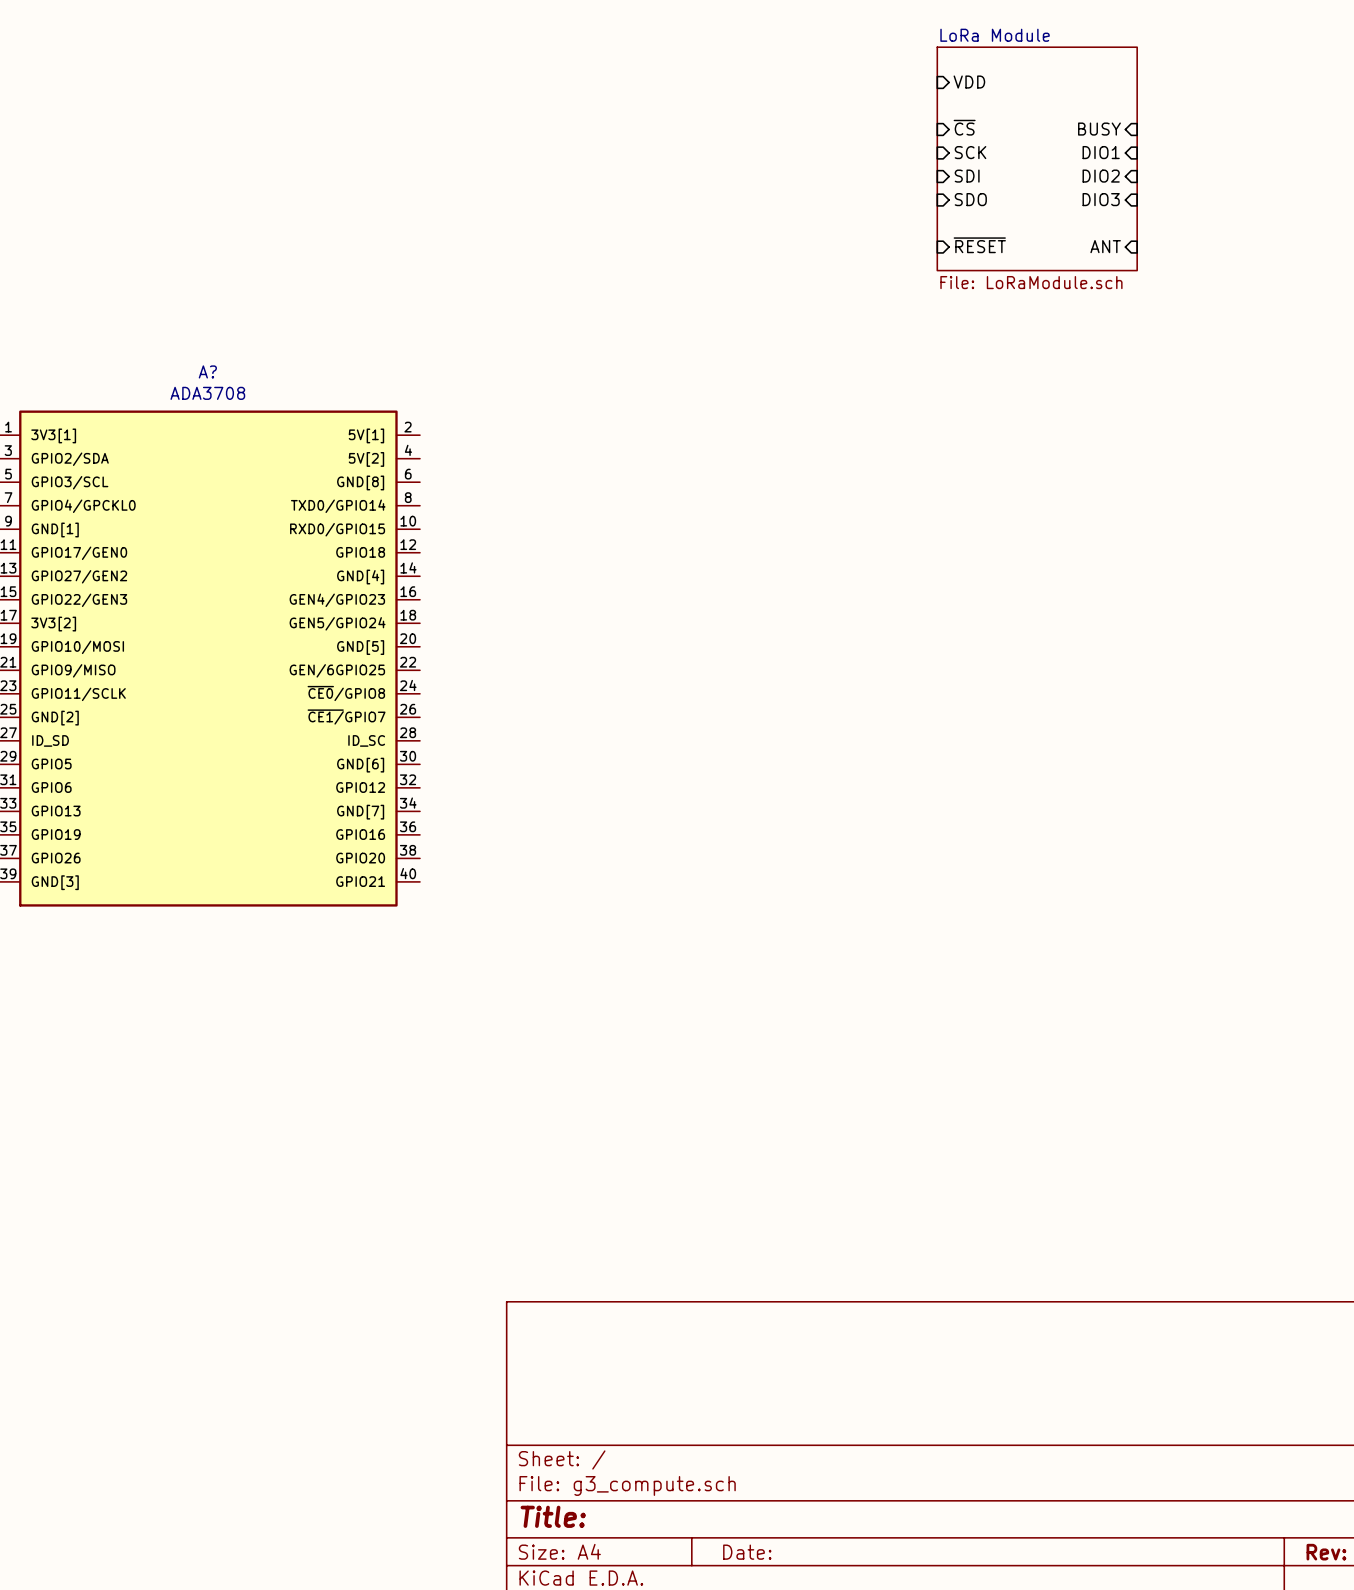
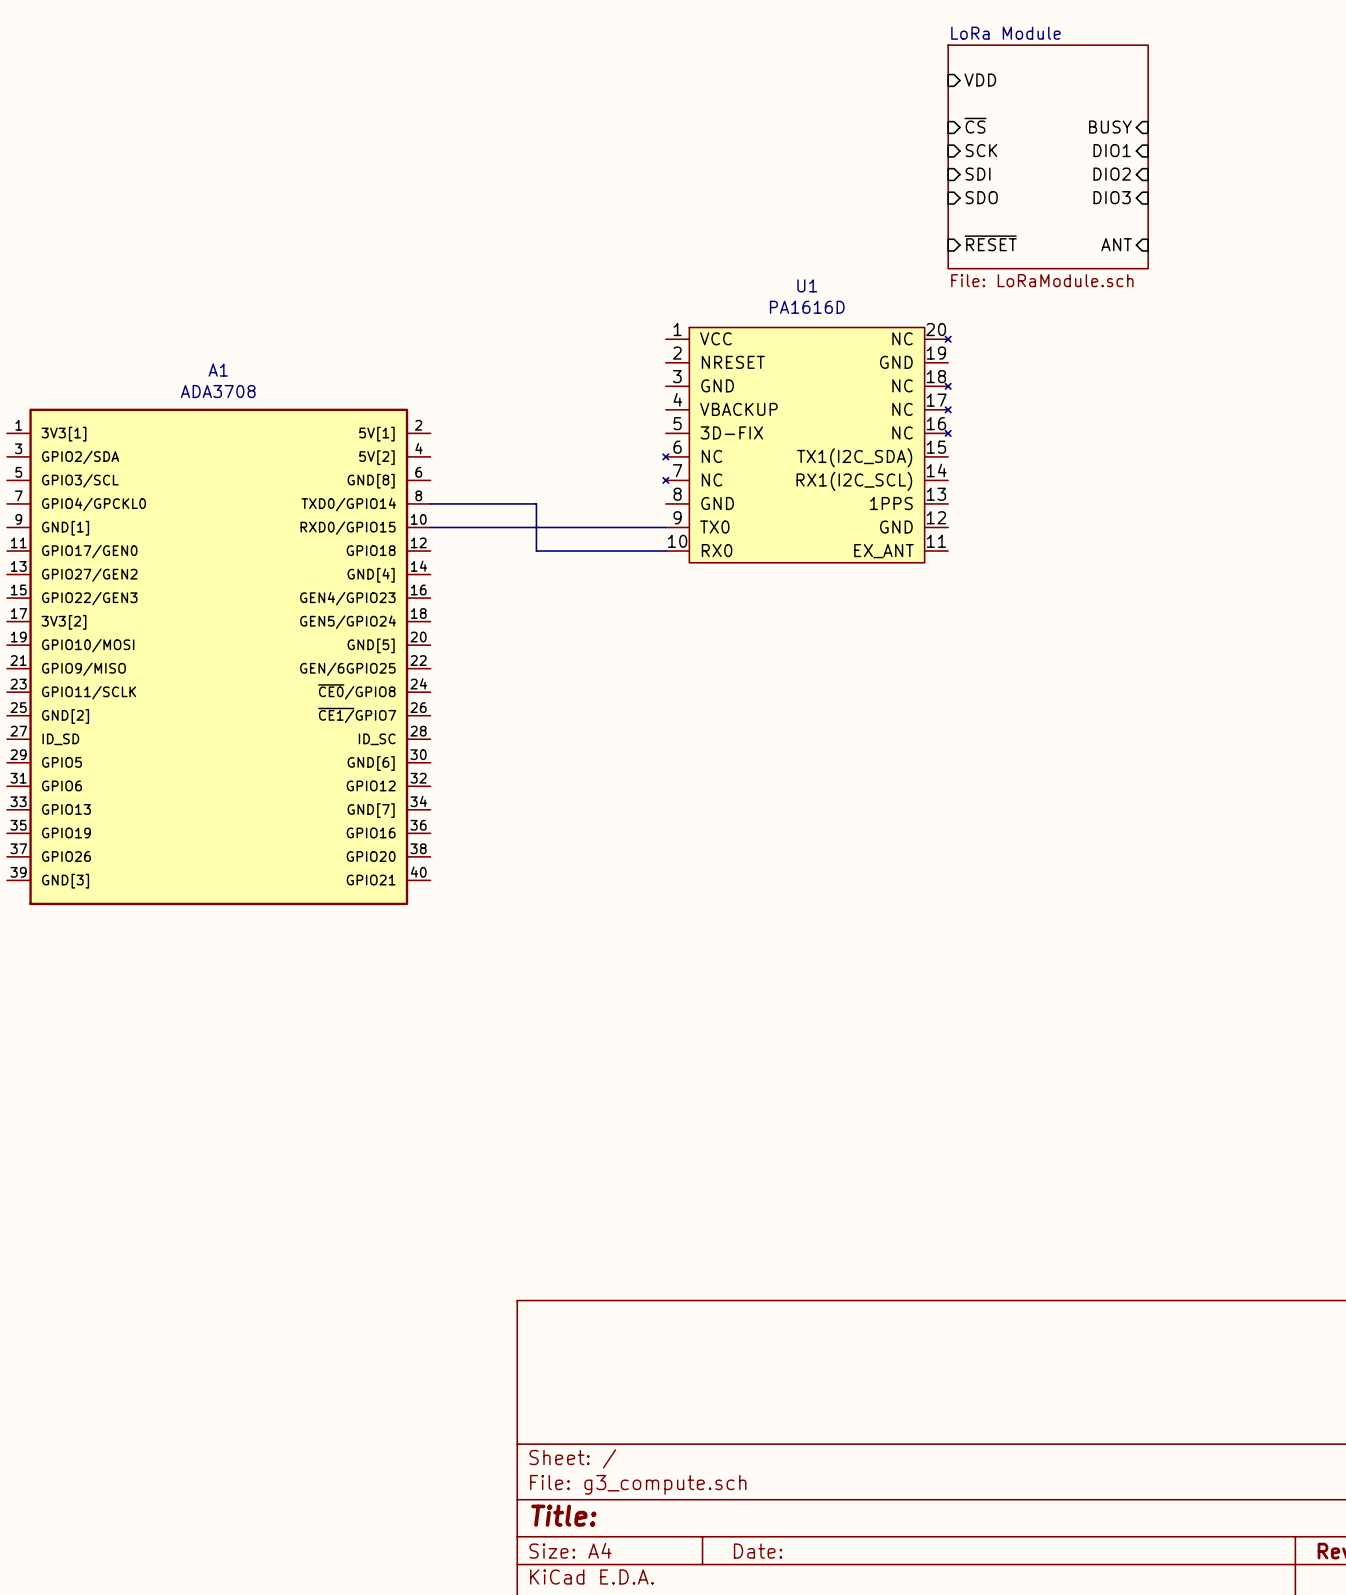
A? name: A? (207, 371) -> A1 (218, 370)
U1: none -> PA1616D (807, 445)
wire: none -> (430, 503) (536, 503) (536, 551) (665, 551)
wire: none -> (430, 527) (665, 527)

